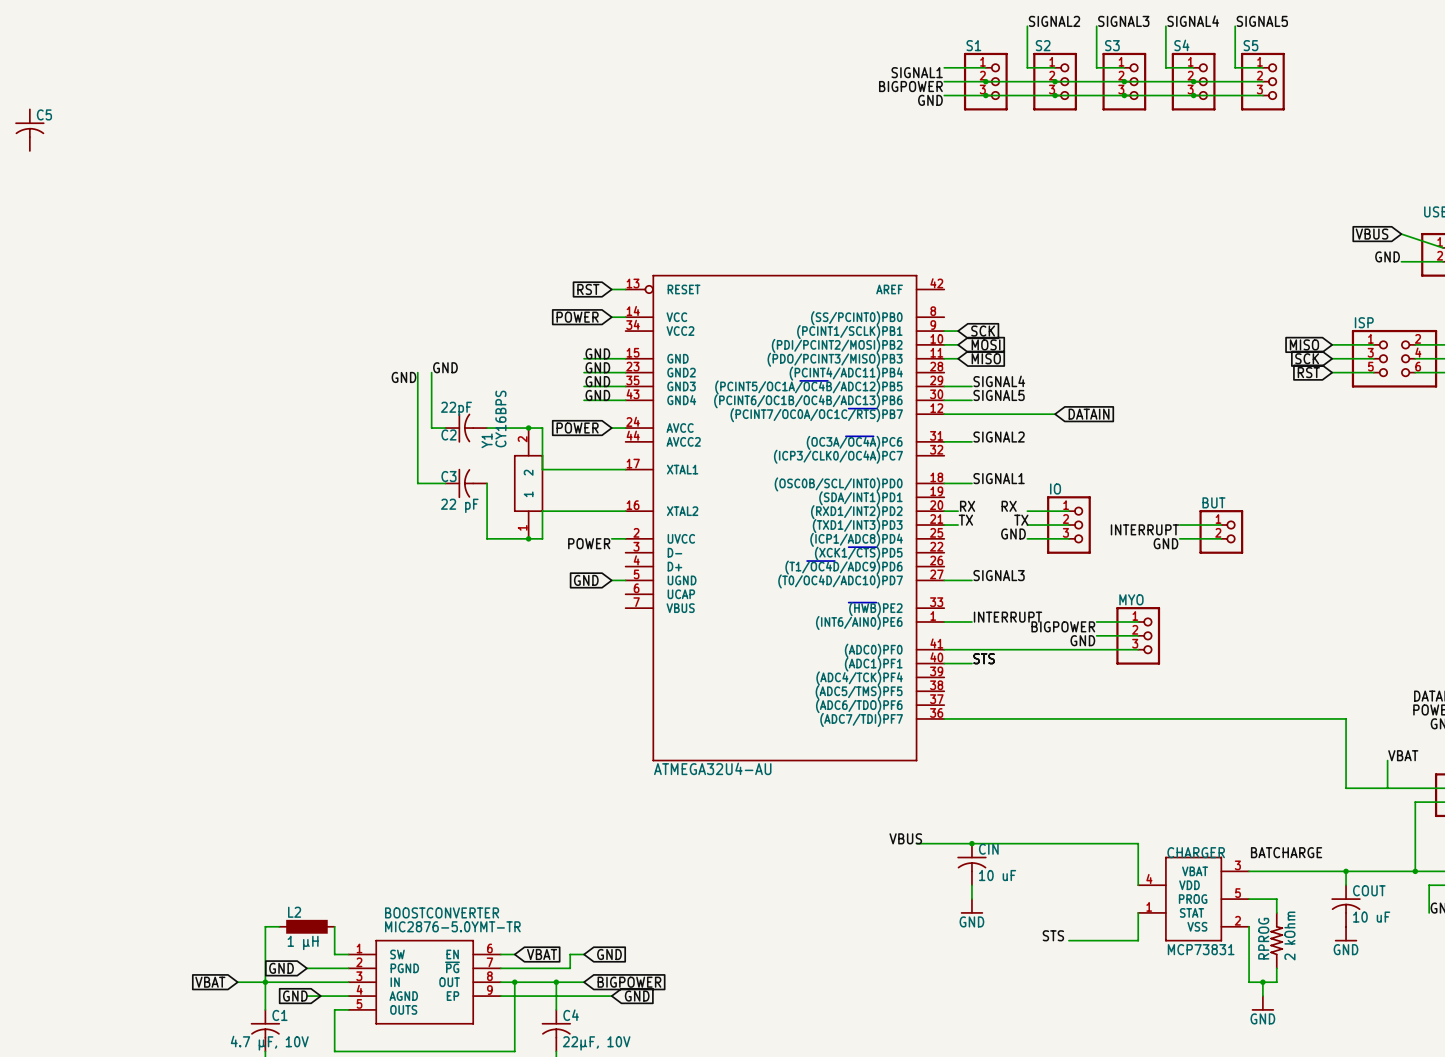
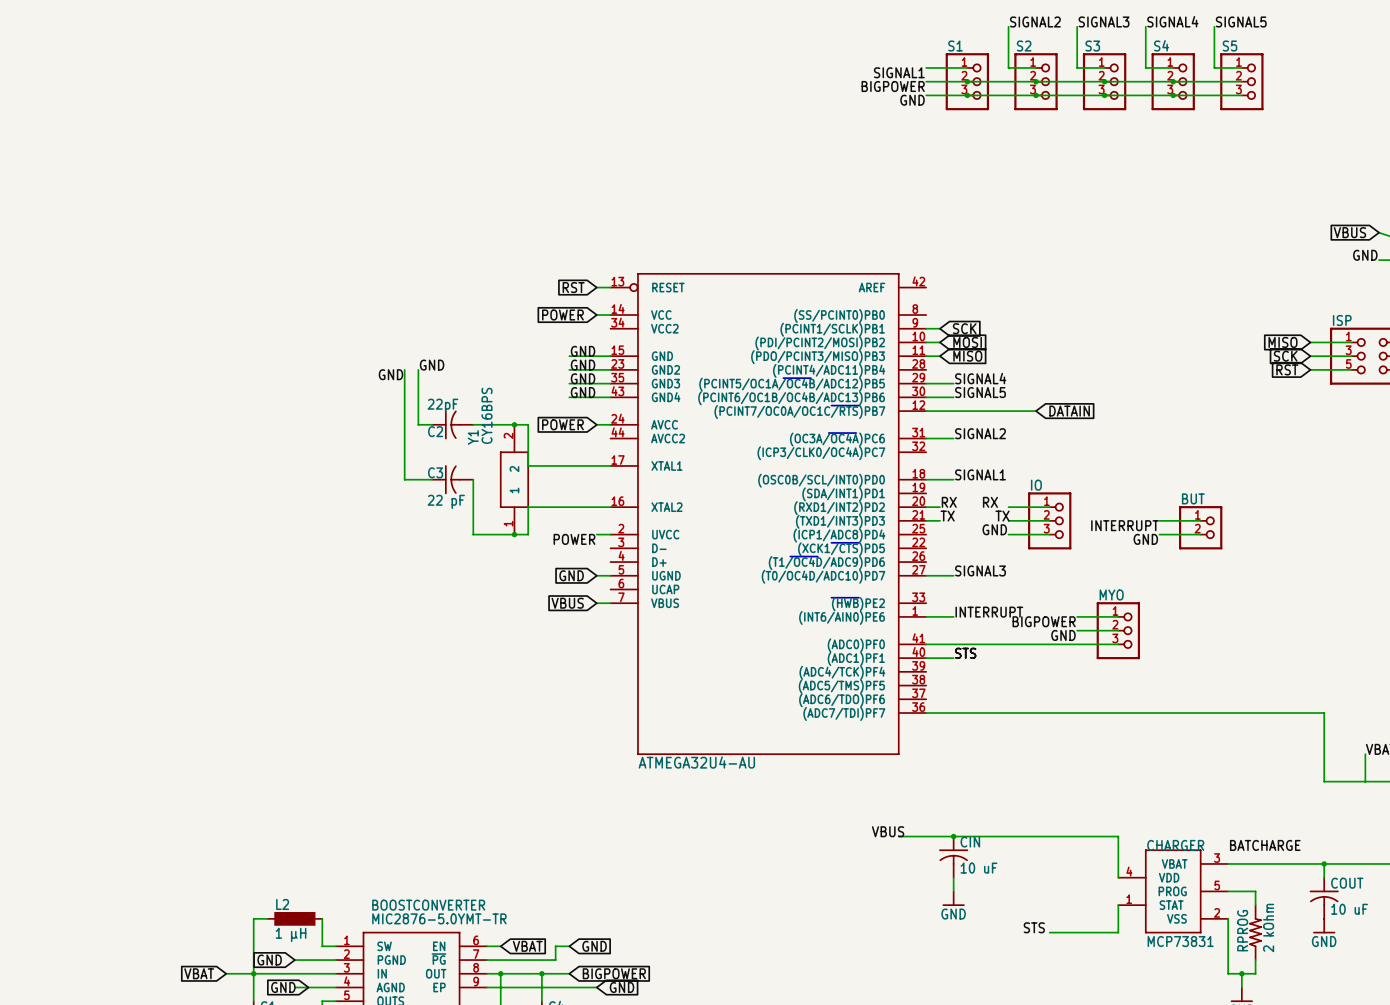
C5: (29, 130) -> none
global label: none -> VBUS (567, 603)
wire: none -> (596, 603) (610, 603)

